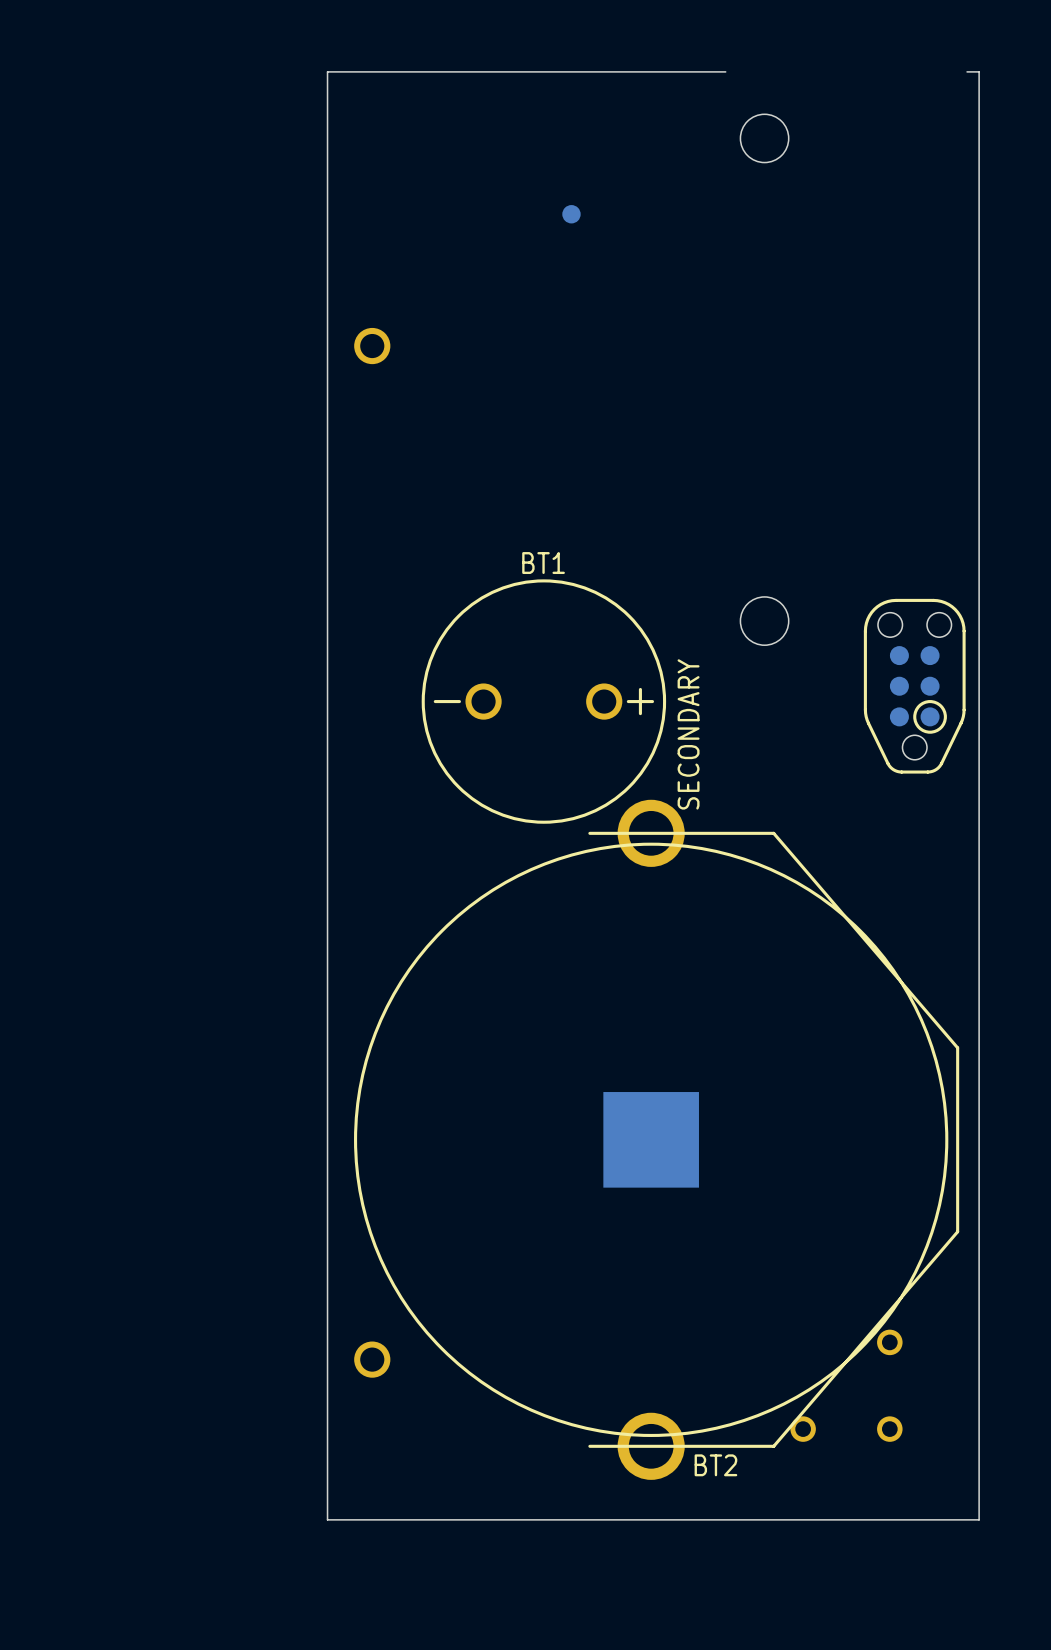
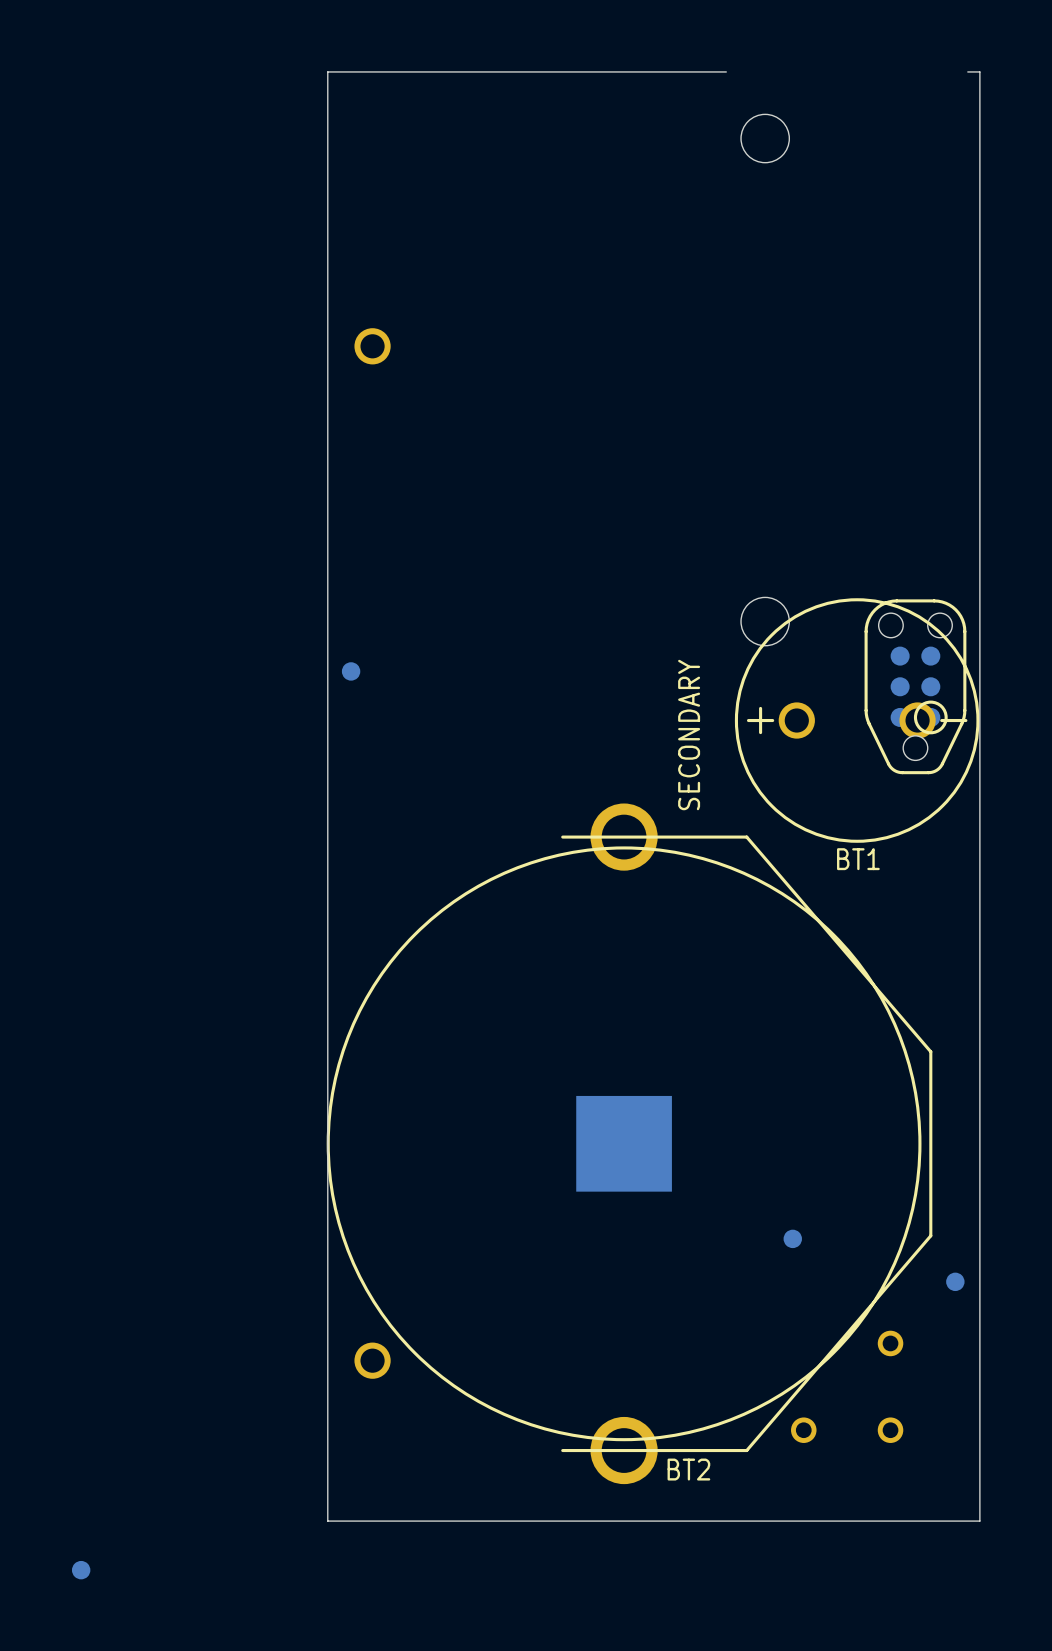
part position: (571, 214) -> (351, 671)
BT1 rotation: 0° (543, 701) -> 180° (857, 720)
BT1 position: (543, 701) -> (857, 720)
BT2 position: (656, 1139) -> (629, 1143)
part: none -> (792, 1238)
part: none -> (955, 1281)
part: none -> (81, 1570)

